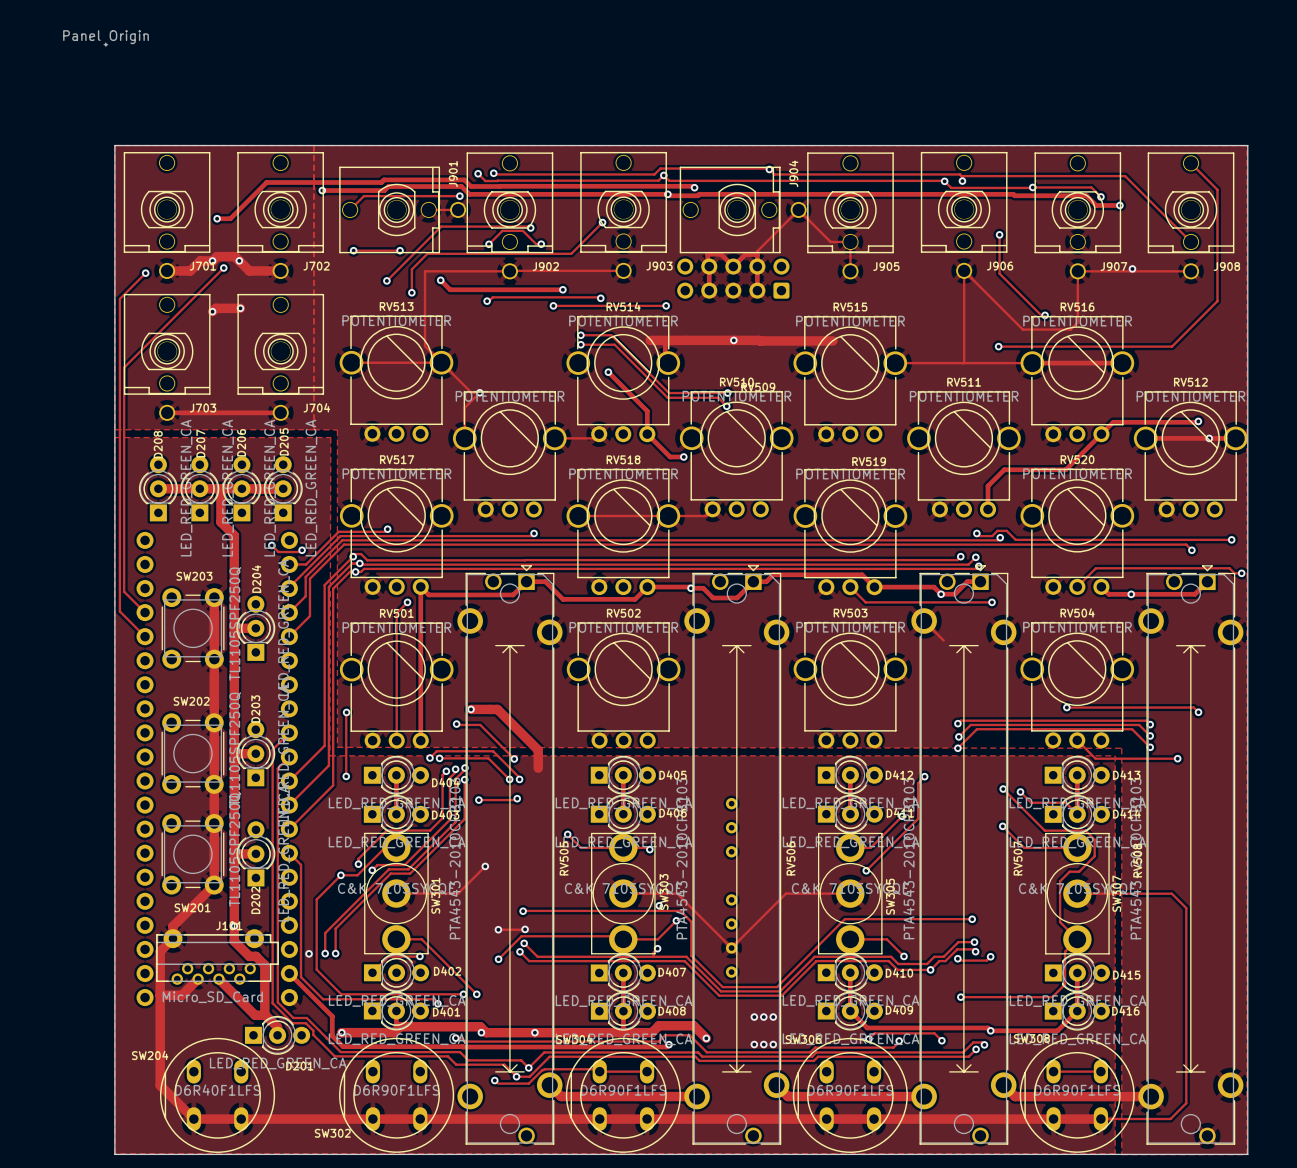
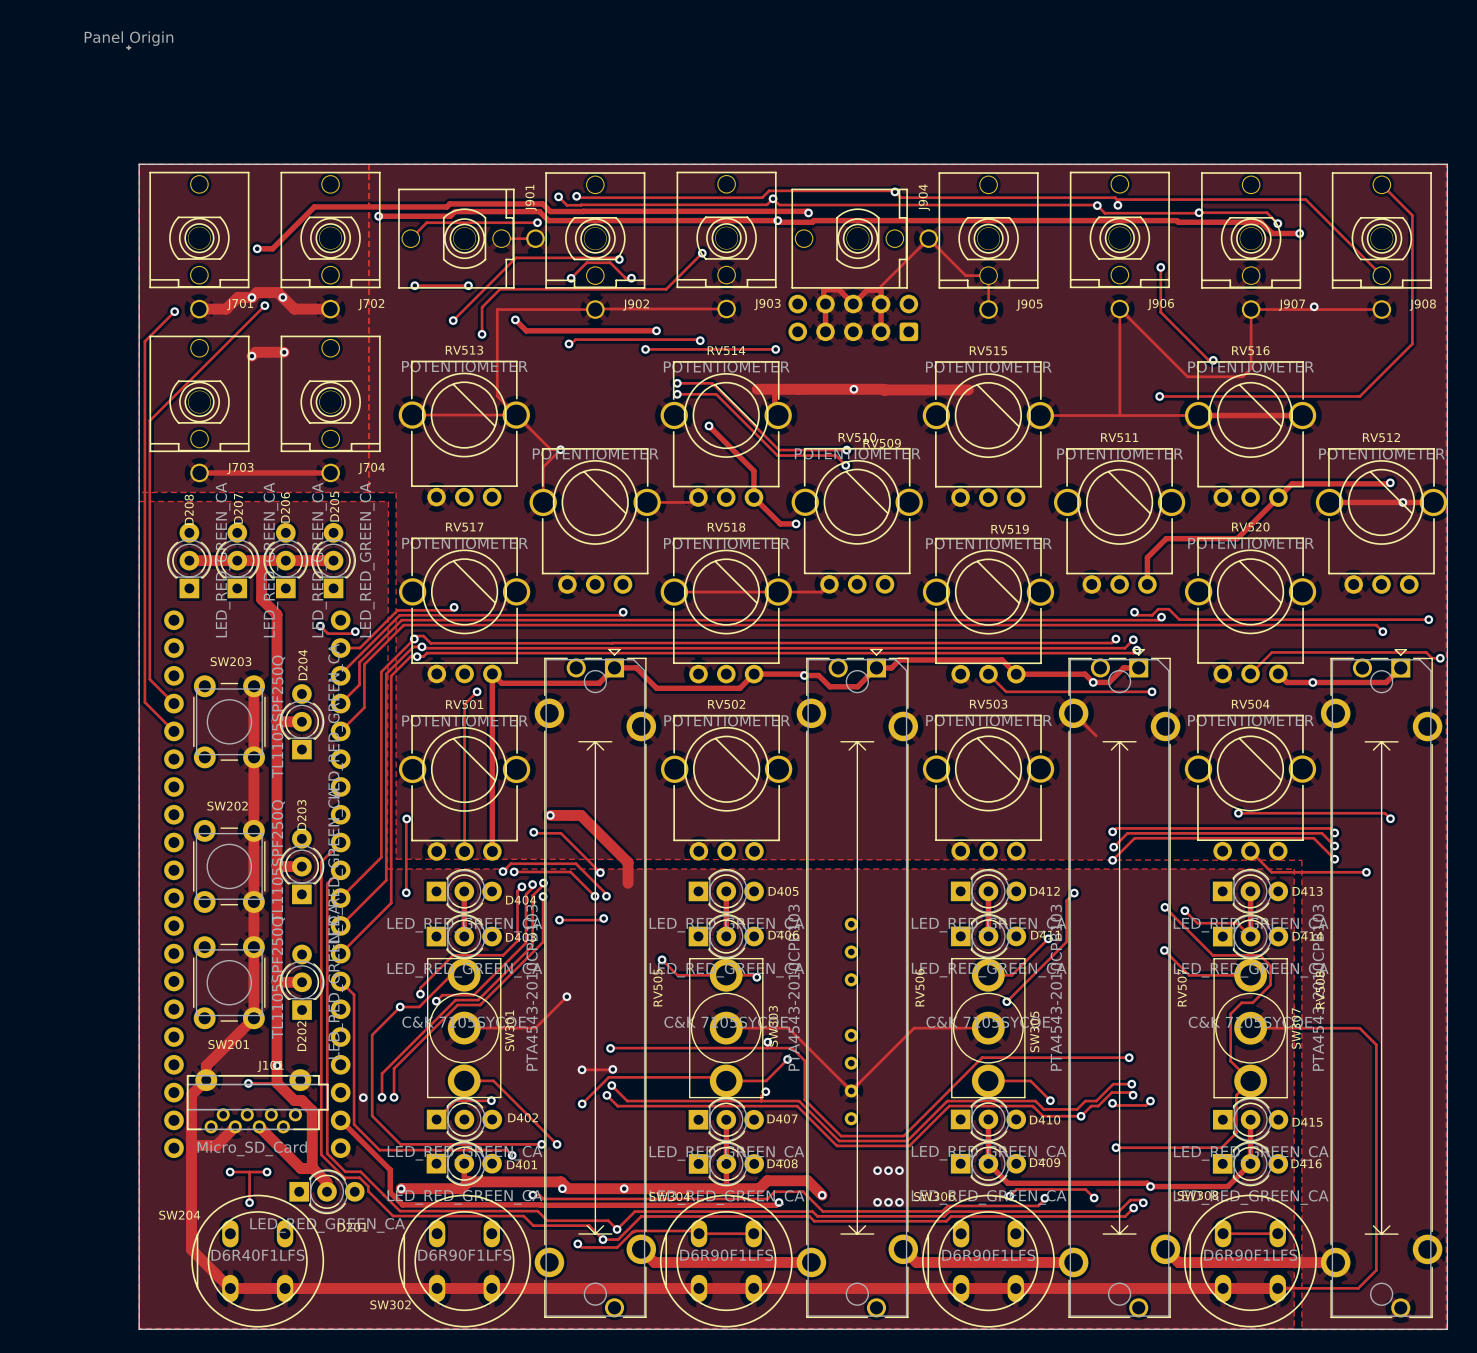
via: none -> (248, 1083)
track: none -> (277, 1083) (248, 1083)
track: none -> (230, 1172) (267, 1172)
via: none -> (230, 1172)
track: none -> (249, 1172) (249, 1202)
via: none -> (267, 1172)
via: none -> (249, 1202)

